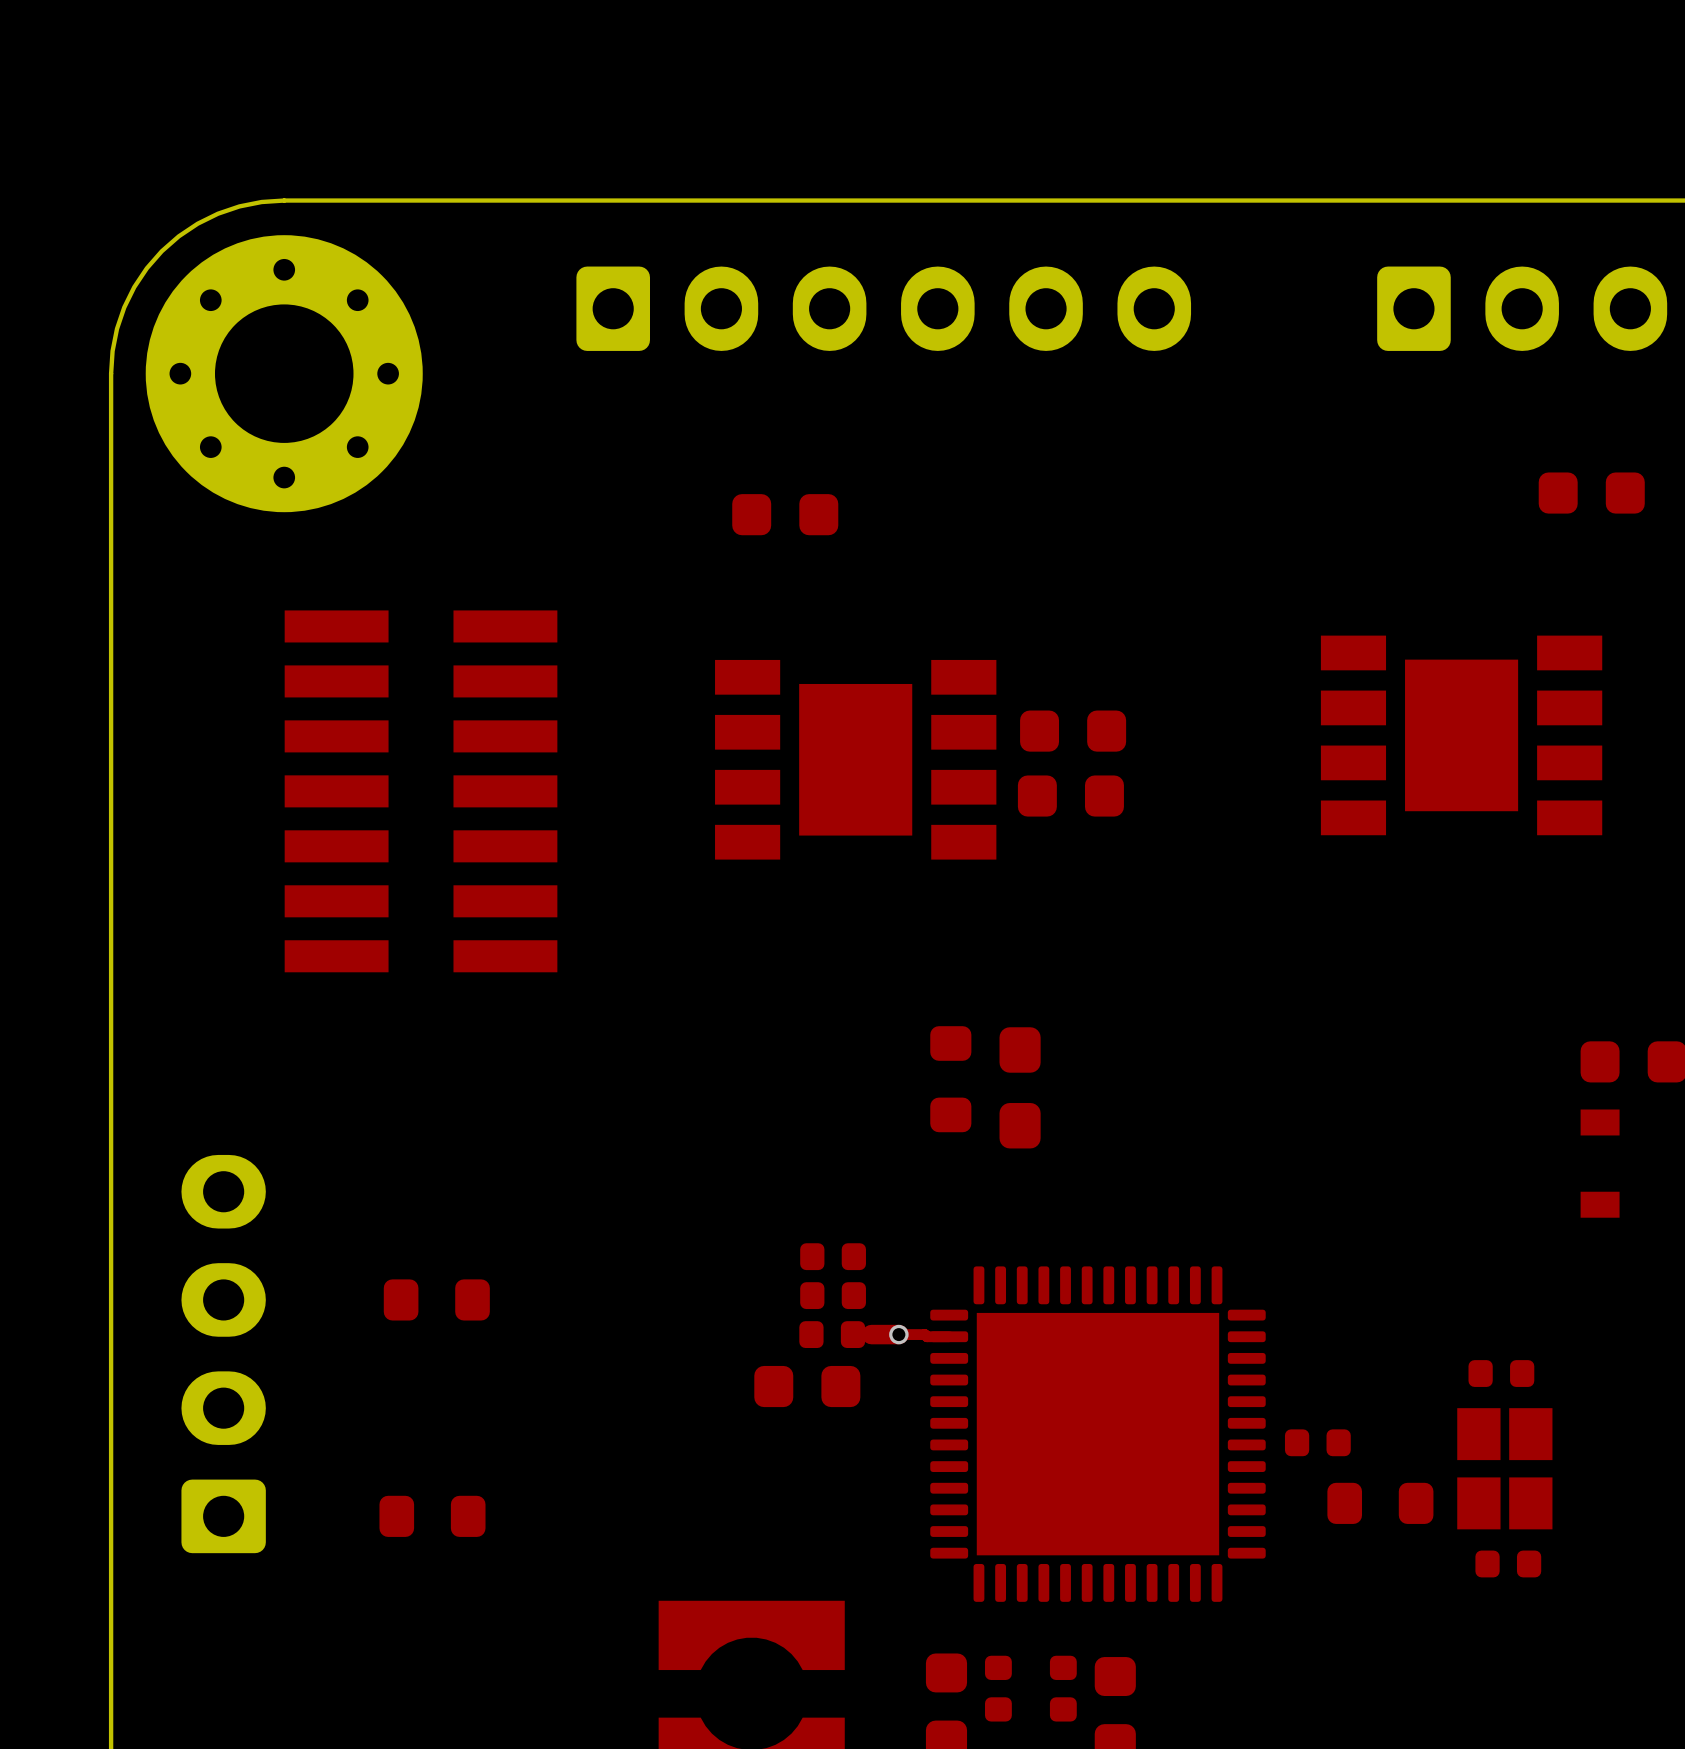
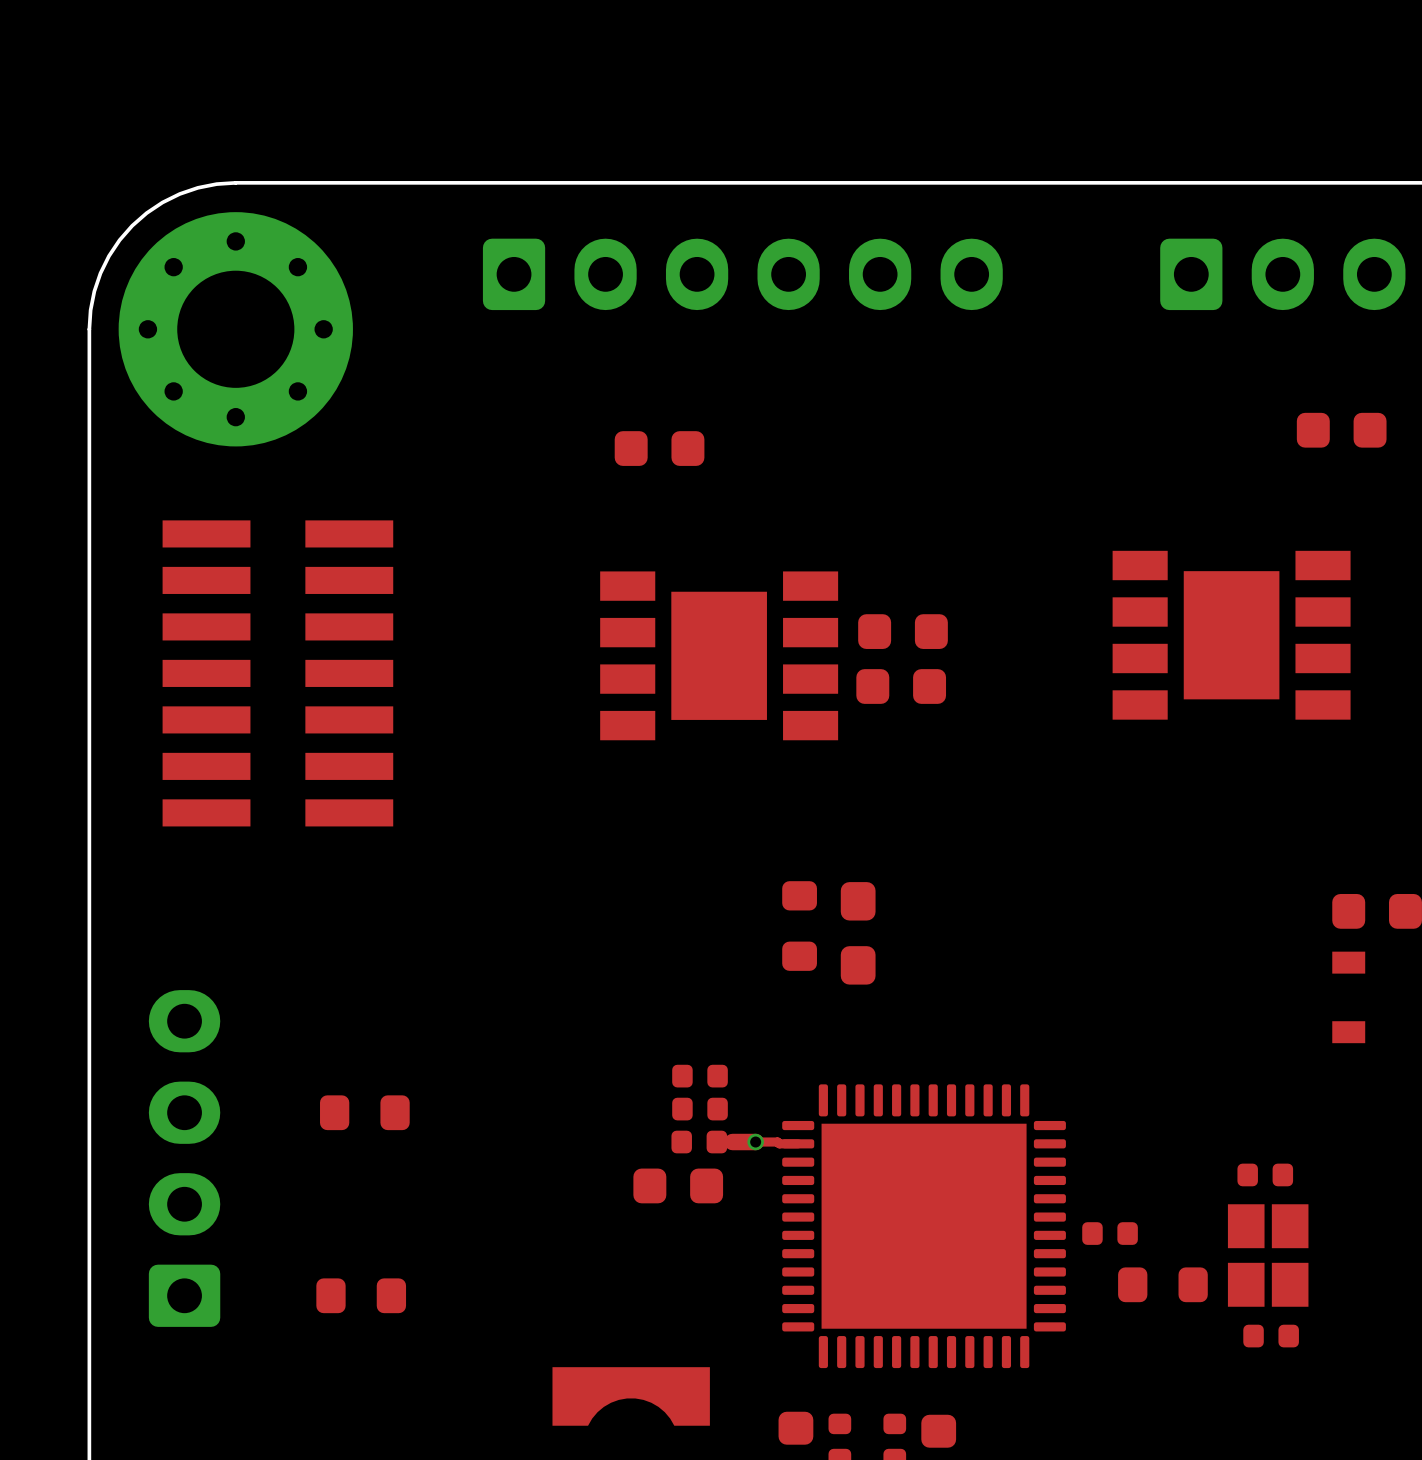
part position: (421, 791) -> (277, 673)

